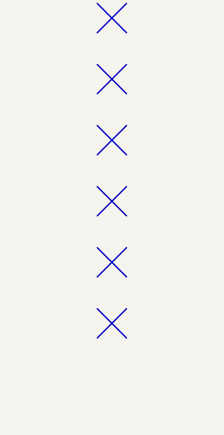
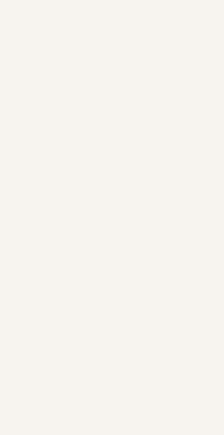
no-connect mark: (111, 18) -> none
no-connect mark: (111, 79) -> none
no-connect mark: (111, 140) -> none
no-connect mark: (111, 201) -> none
no-connect mark: (111, 262) -> none
no-connect mark: (111, 323) -> none

